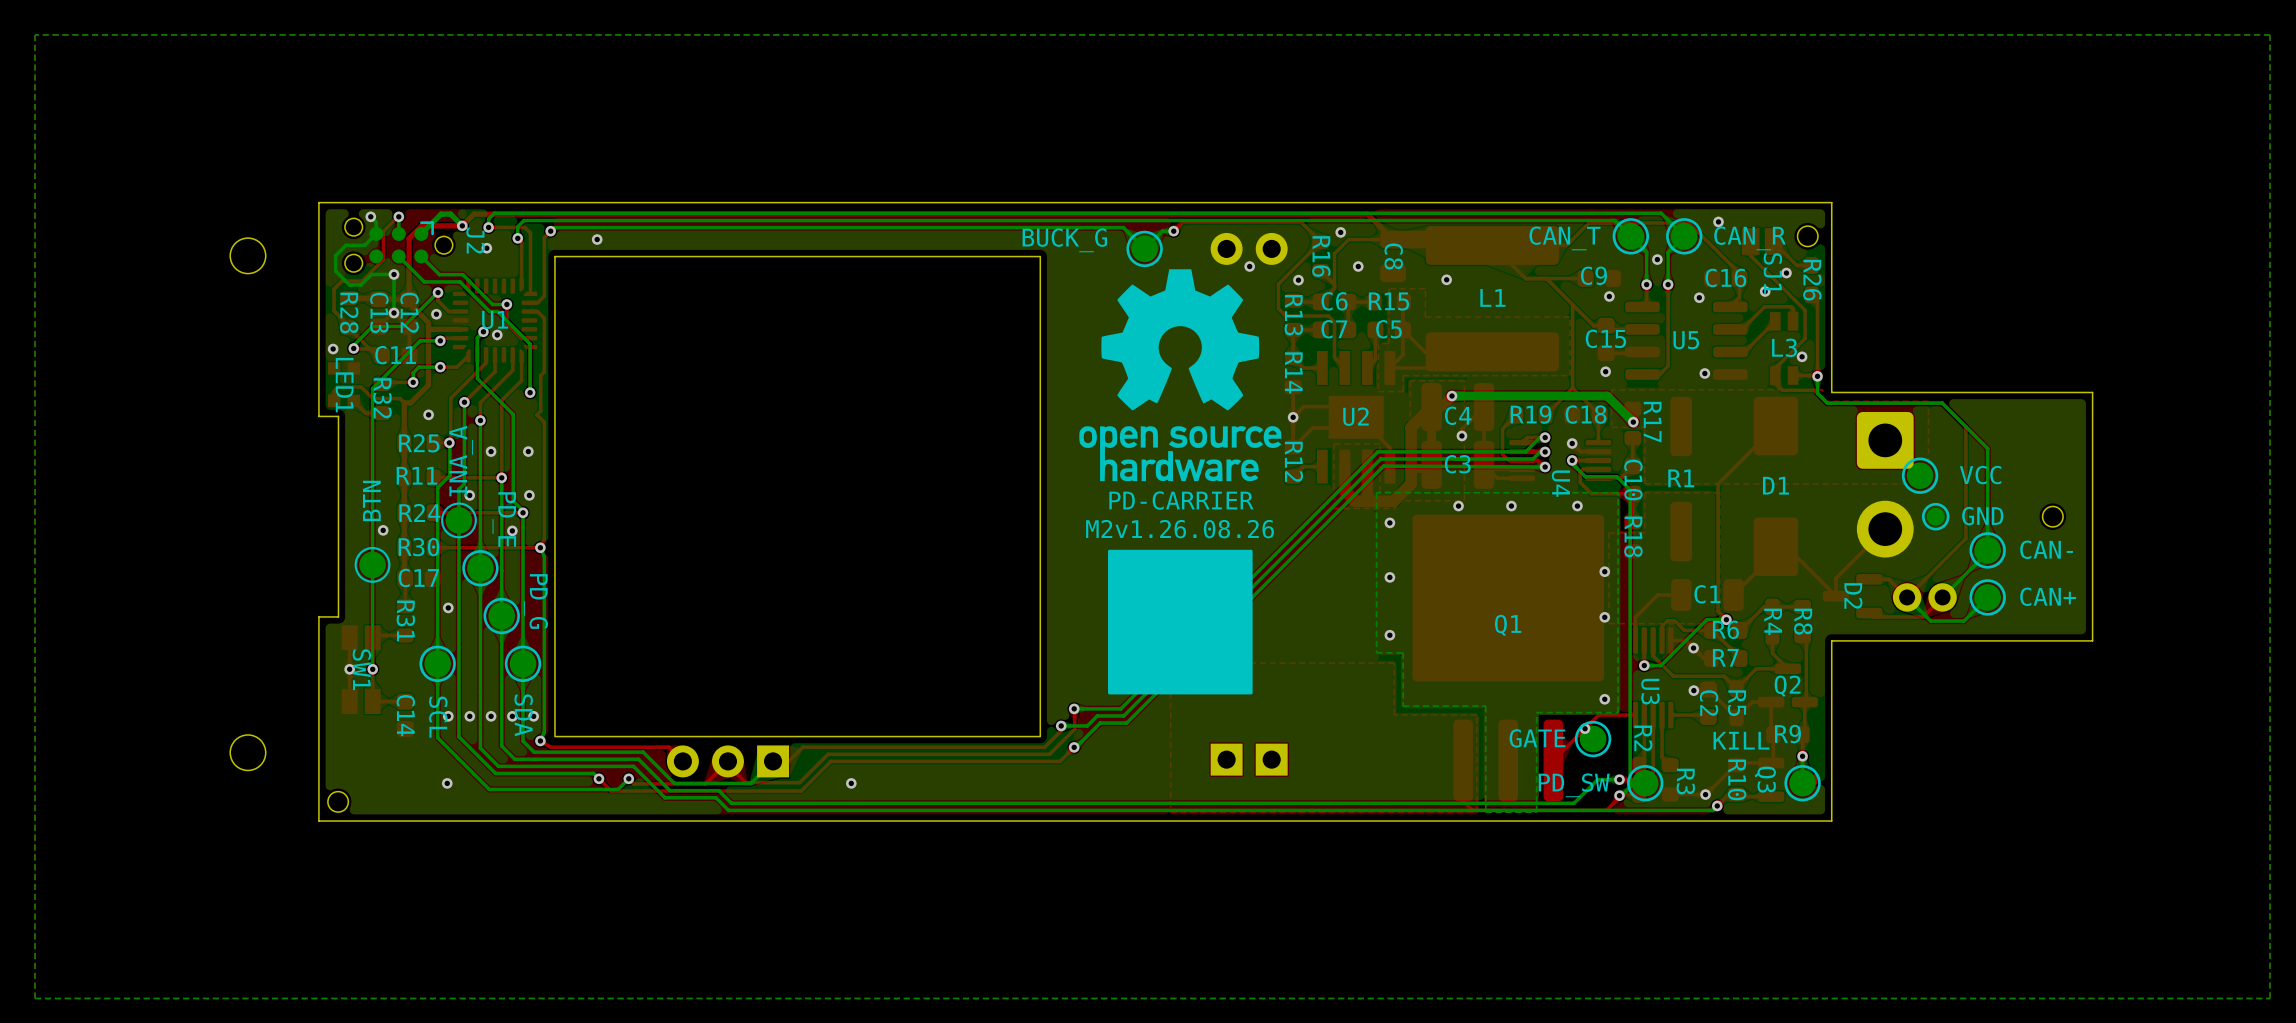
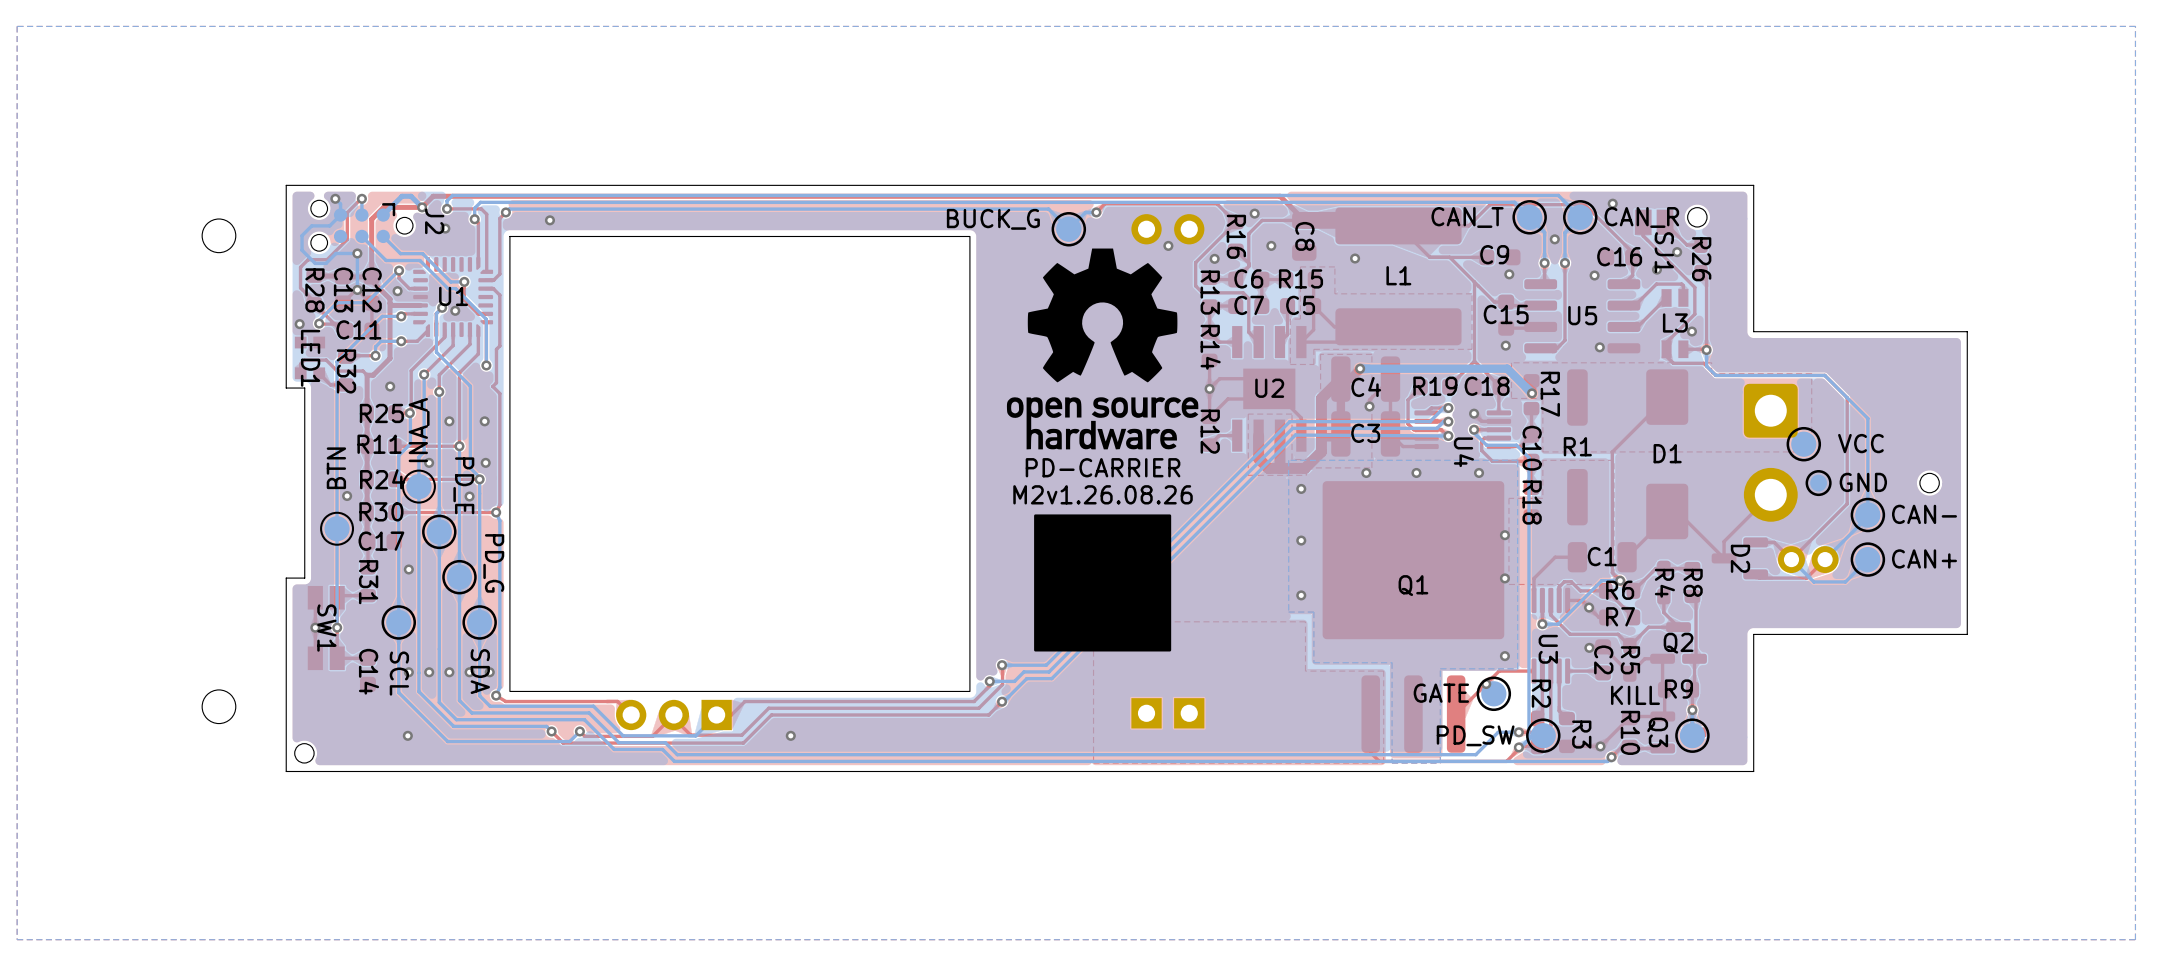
board edge: (1831, 202) (1831, 392) (2092, 392) -> (1720, 185) (1753, 185) (1753, 331) (1967, 331) (1967, 365)
board edge: (2092, 640) (1831, 640) (1831, 821) -> (1967, 600) (1967, 634) (1753, 634) (1753, 771) (1720, 771)

